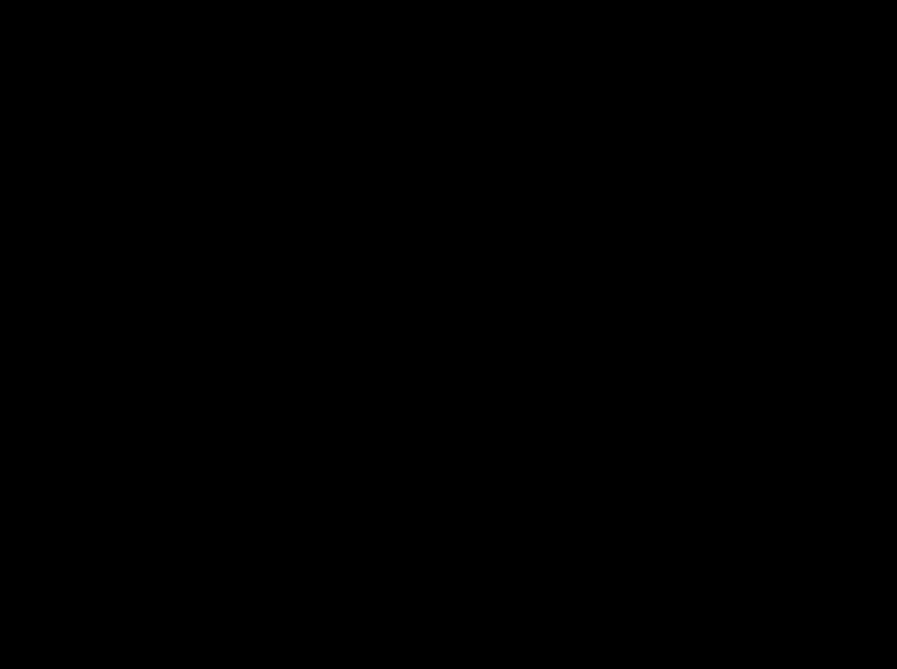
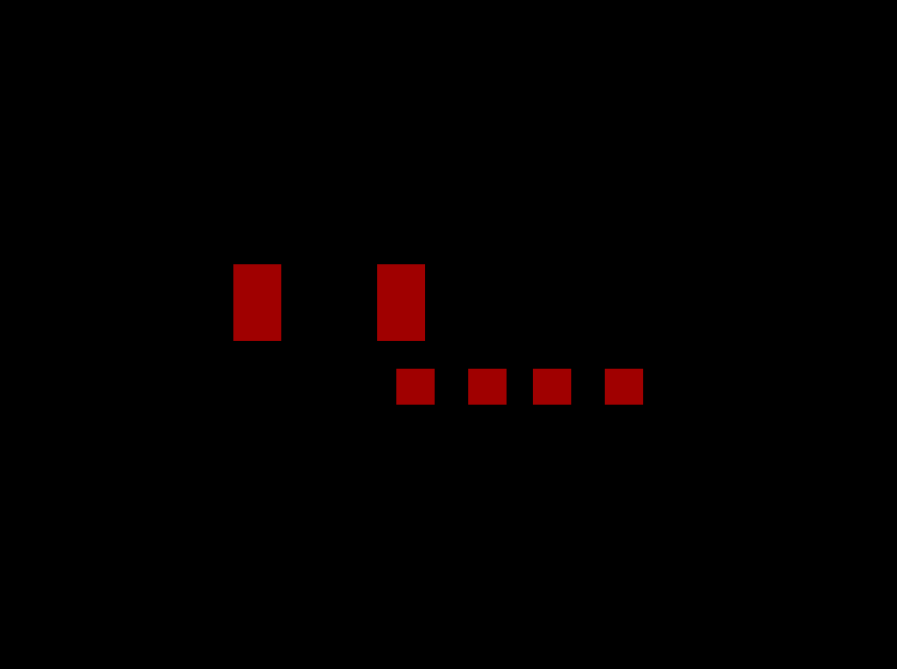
part: none -> (329, 302)
part: none -> (451, 386)
part: none -> (588, 386)

